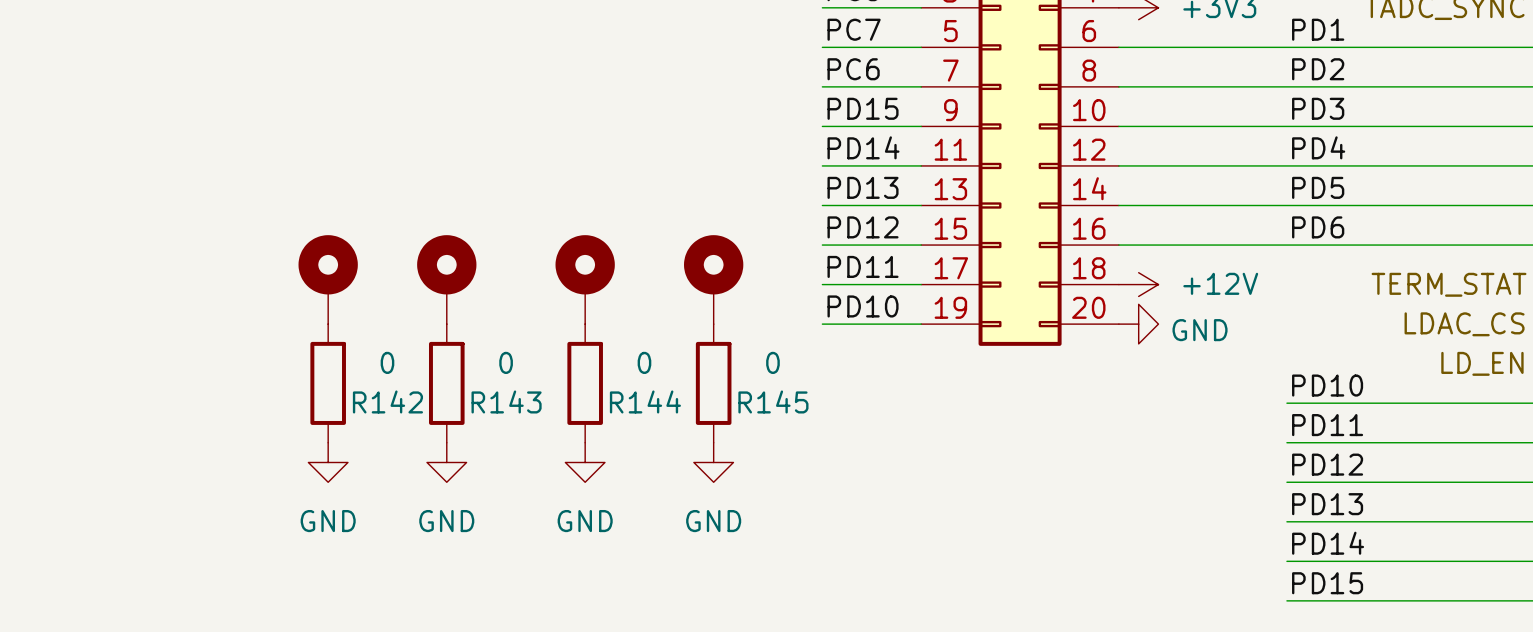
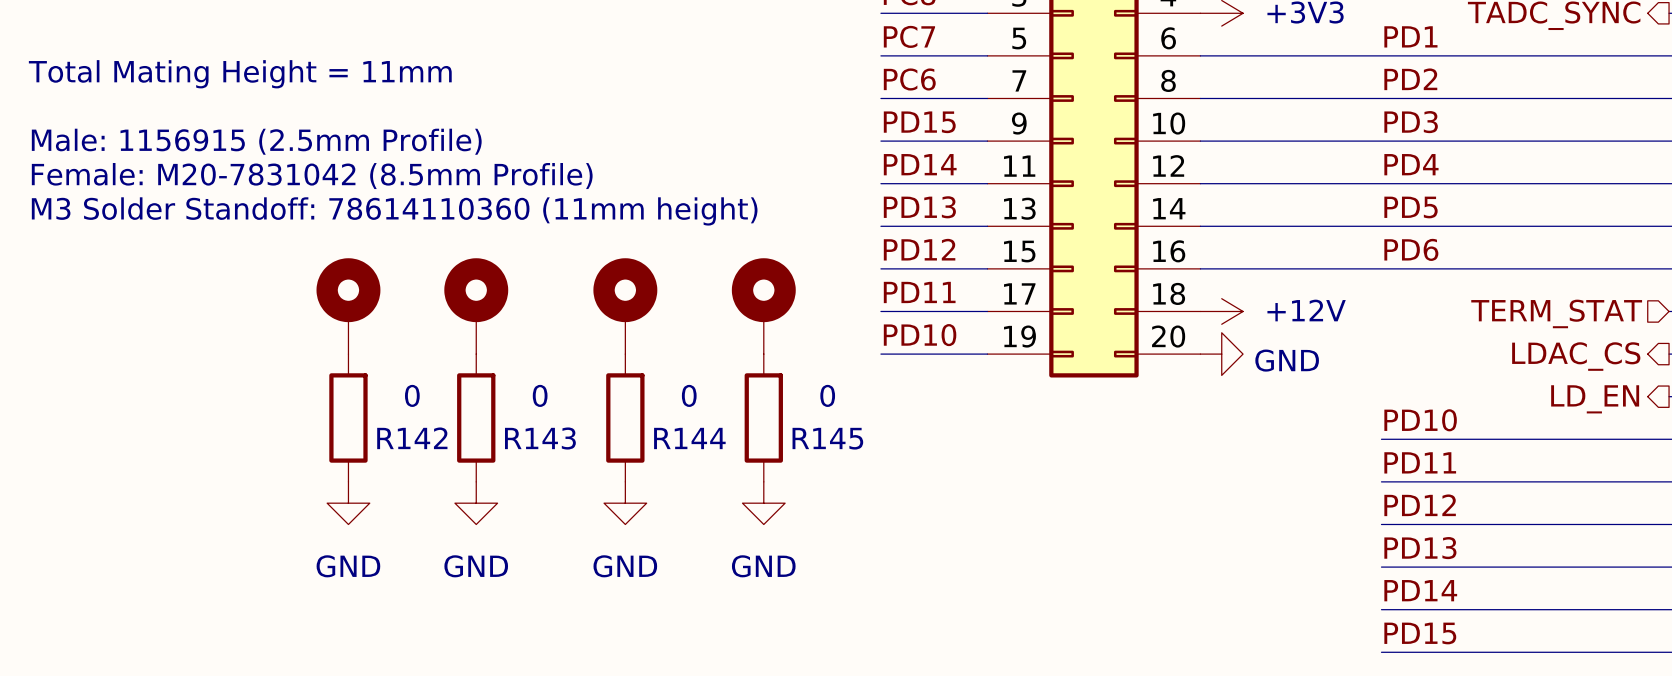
text: none -> Total Mating Height = 11mm (240, 74)
text: none -> Male: 1156915 (2.5mm Profile) (256, 141)
text: none -> Female: M20-7831042 (8.5mm Profile) (312, 176)
text: none -> M3 Solder Standoff: 78614110360 (11mm height) (394, 211)

